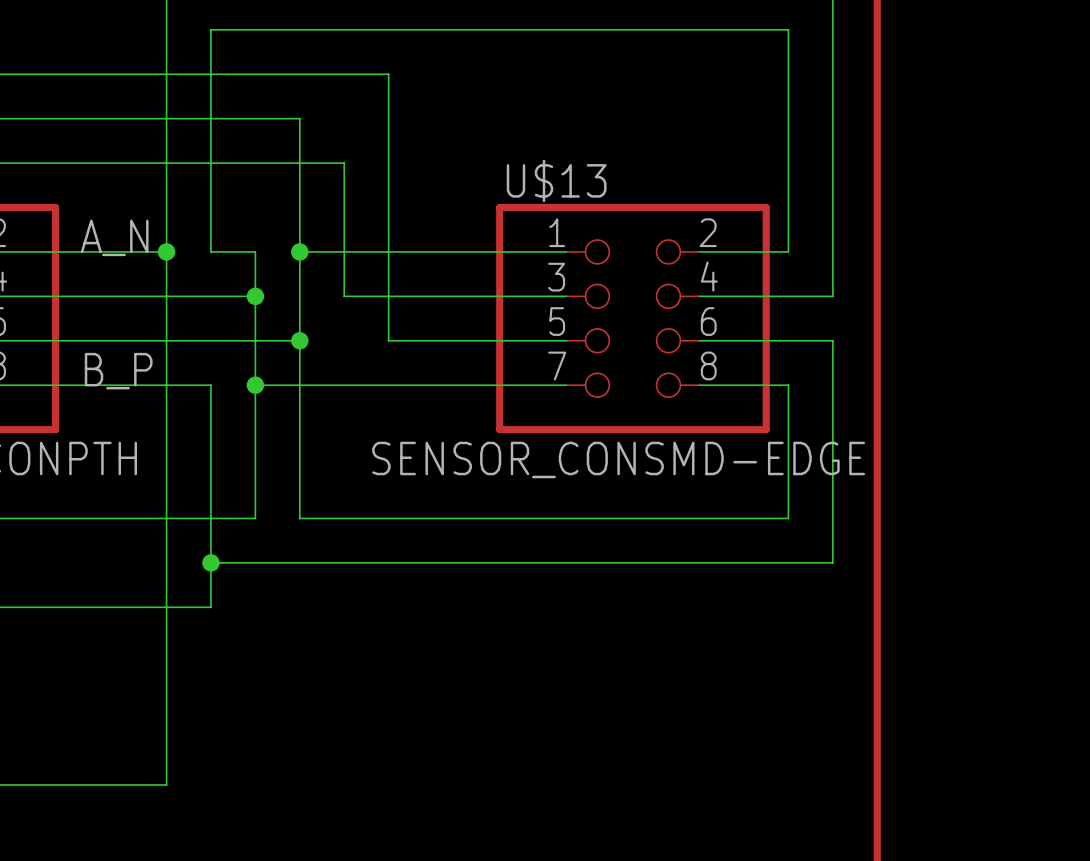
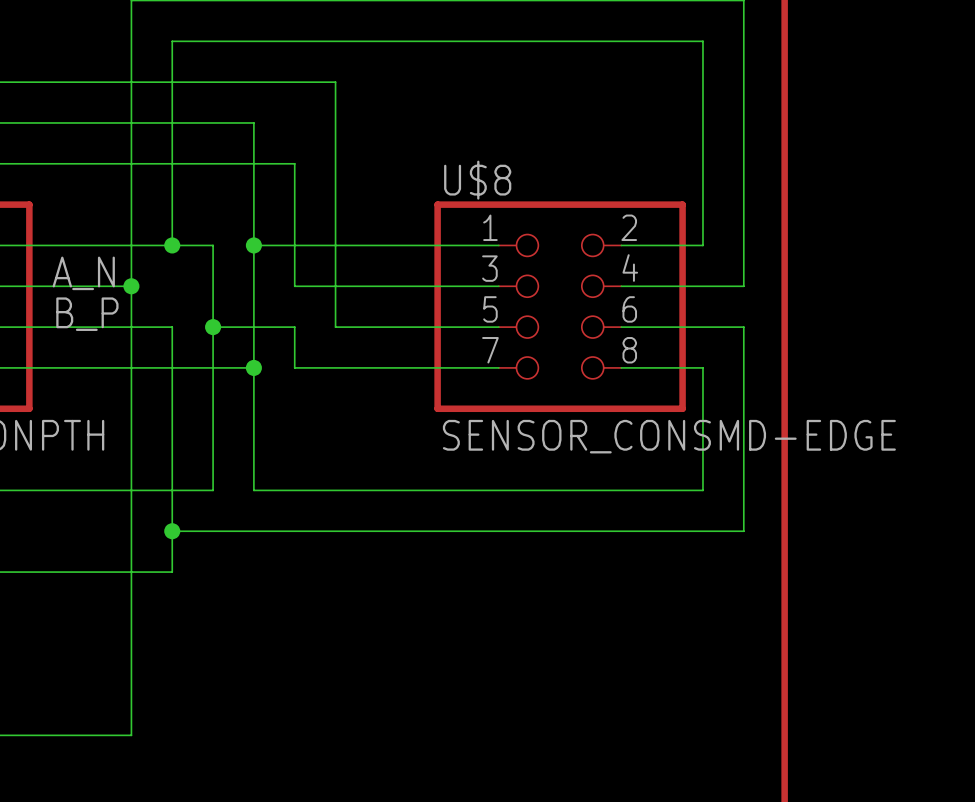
U$13 name: U$13 (556, 180) -> U$8 (477, 180)
label position: A_N (114, 237) -> A_N (83, 273)
wire: none -> (131, 245) (172, 245)
junction: (166, 251) -> none
junction: none -> (172, 245)
wire: (166, 296) (255, 296) -> none
junction: none -> (131, 286)
junction: (255, 296) -> none
wire: (210, 340) (255, 340) -> (172, 327) (172, 367) (213, 367)
junction: none -> (213, 327)
junction: (299, 340) -> none
label position: B_P (118, 371) -> B_P (87, 314)
junction: (255, 385) -> none
wire: (299, 385) (344, 385) -> (253, 327) (294, 327) (294, 367)
junction: none -> (253, 367)
U$13 value position: SENSOR_CONSMD-EDGE (618, 459) -> SENSOR_CONSMD-EDGE (669, 436)

